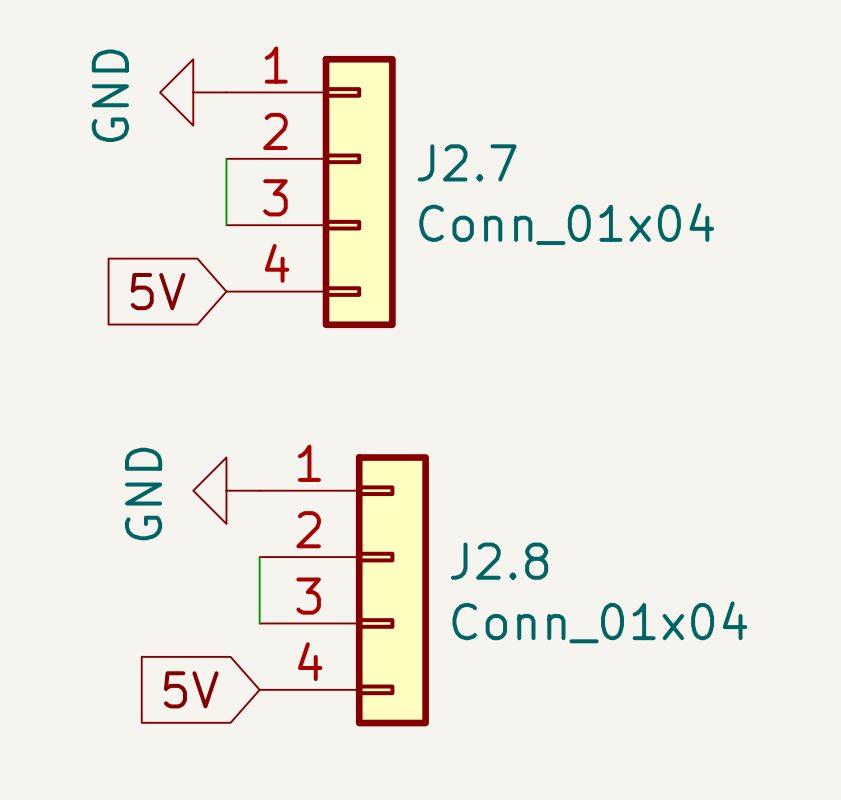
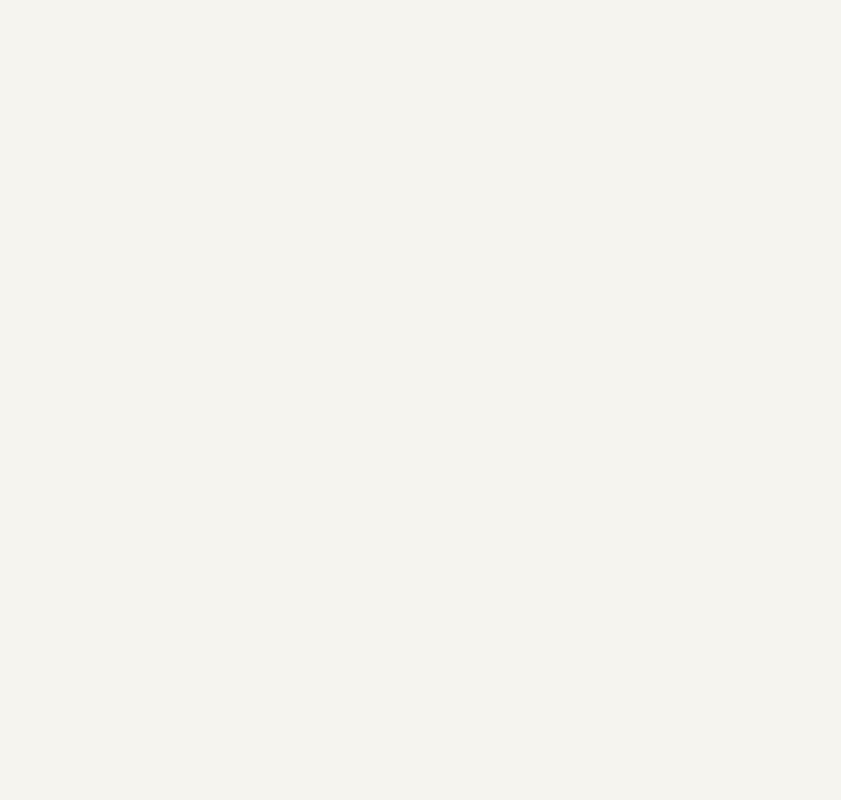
power symbol: GND (193, 92) -> none
wire: (226, 158) (226, 225) -> none
J2.7: Conn_01x04 (311, 192) -> none
global label: 5V (158, 291) -> none
power symbol: GND (226, 490) -> none
wire: (259, 557) (259, 623) -> none
J2.8: Conn_01x04 (344, 590) -> none
global label: 5V (191, 689) -> none

